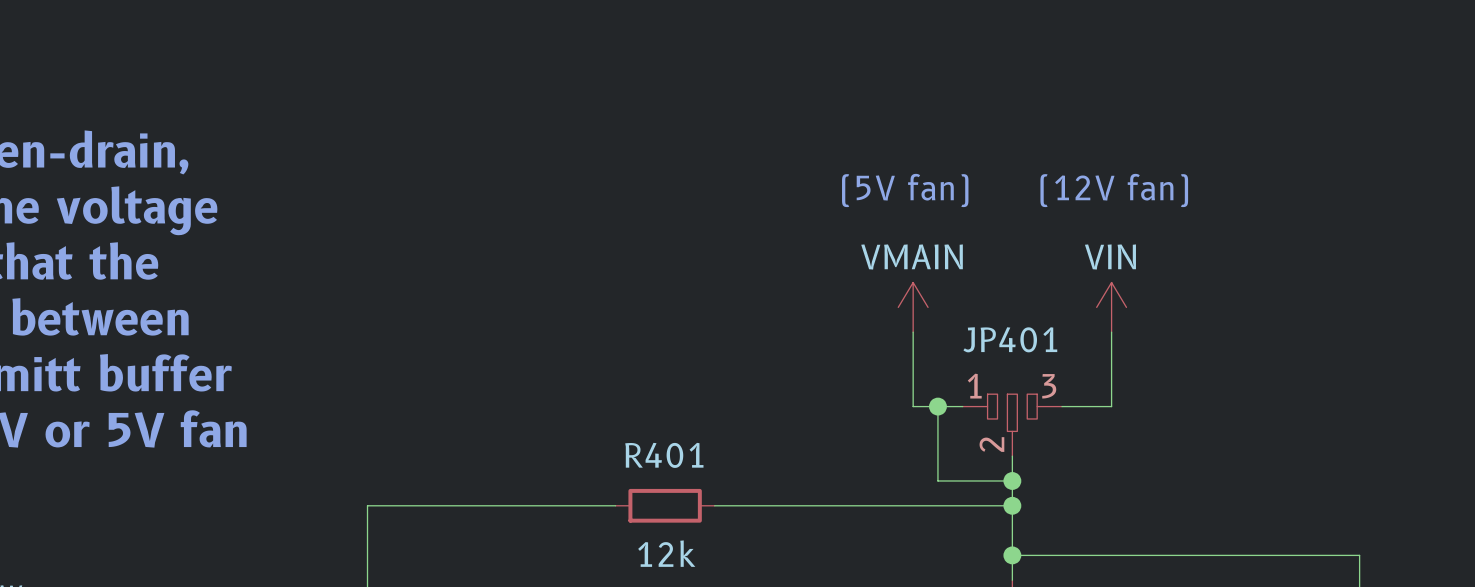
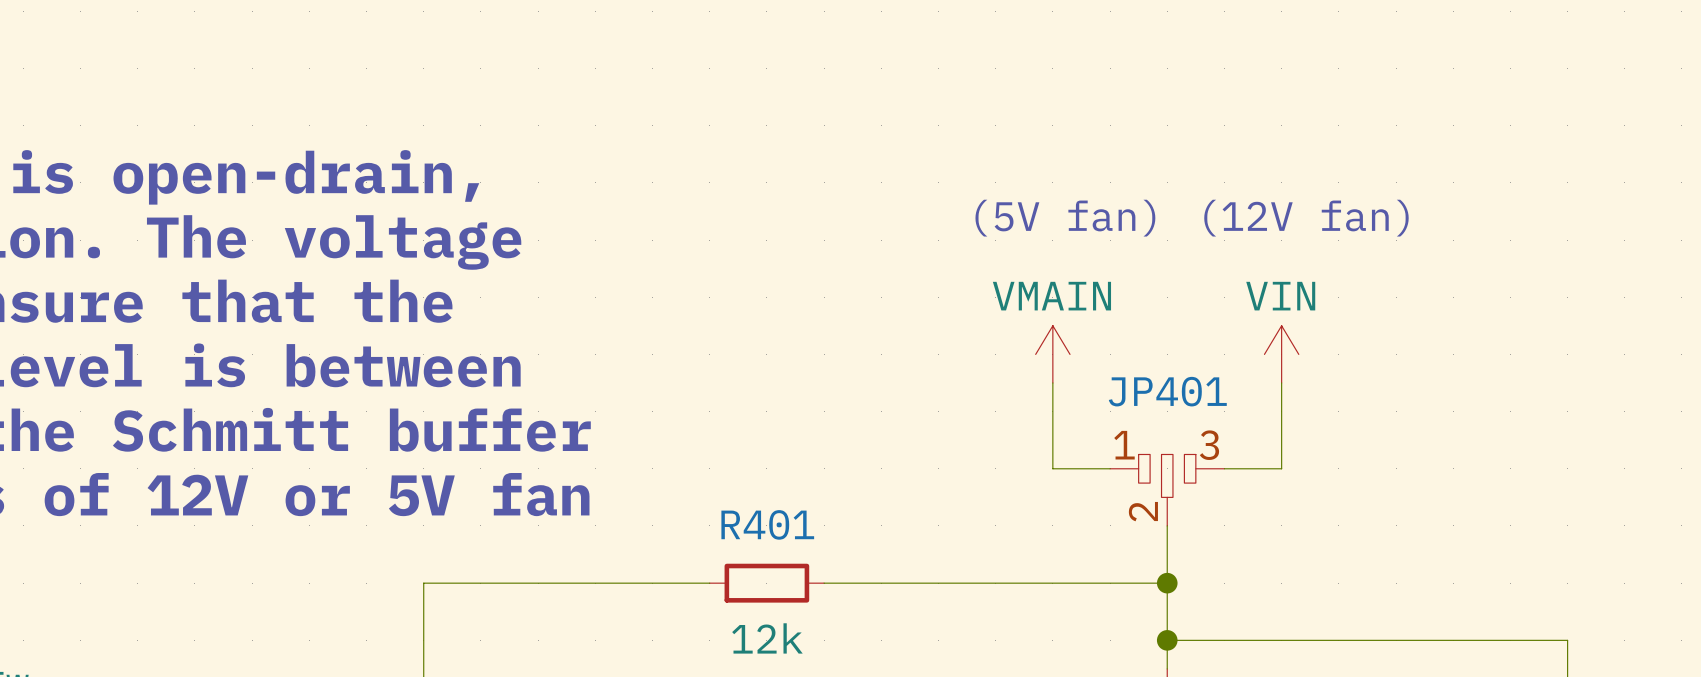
wire: (937, 406) (937, 480) (1012, 480) -> none
junction: (937, 406) -> none
junction: (1012, 480) -> none

